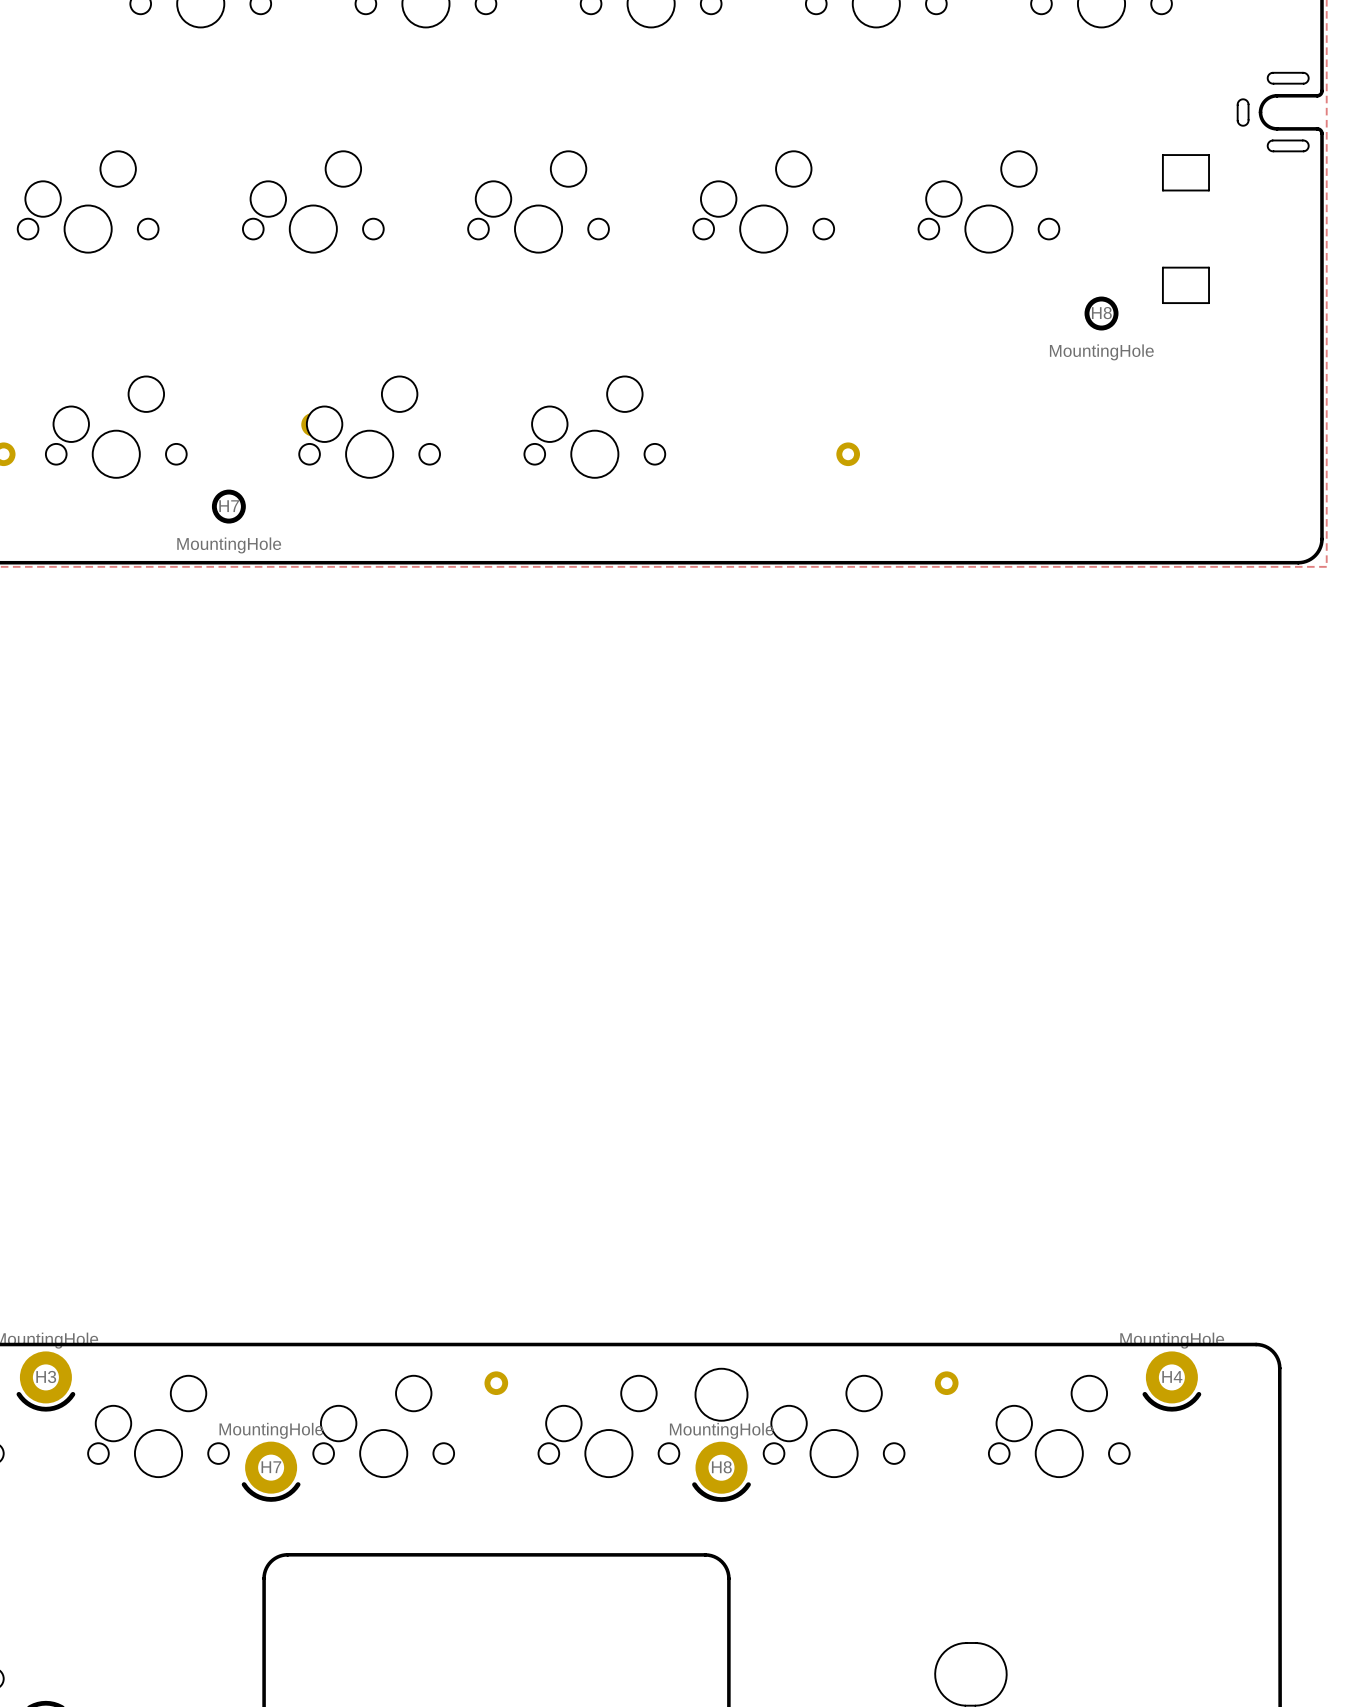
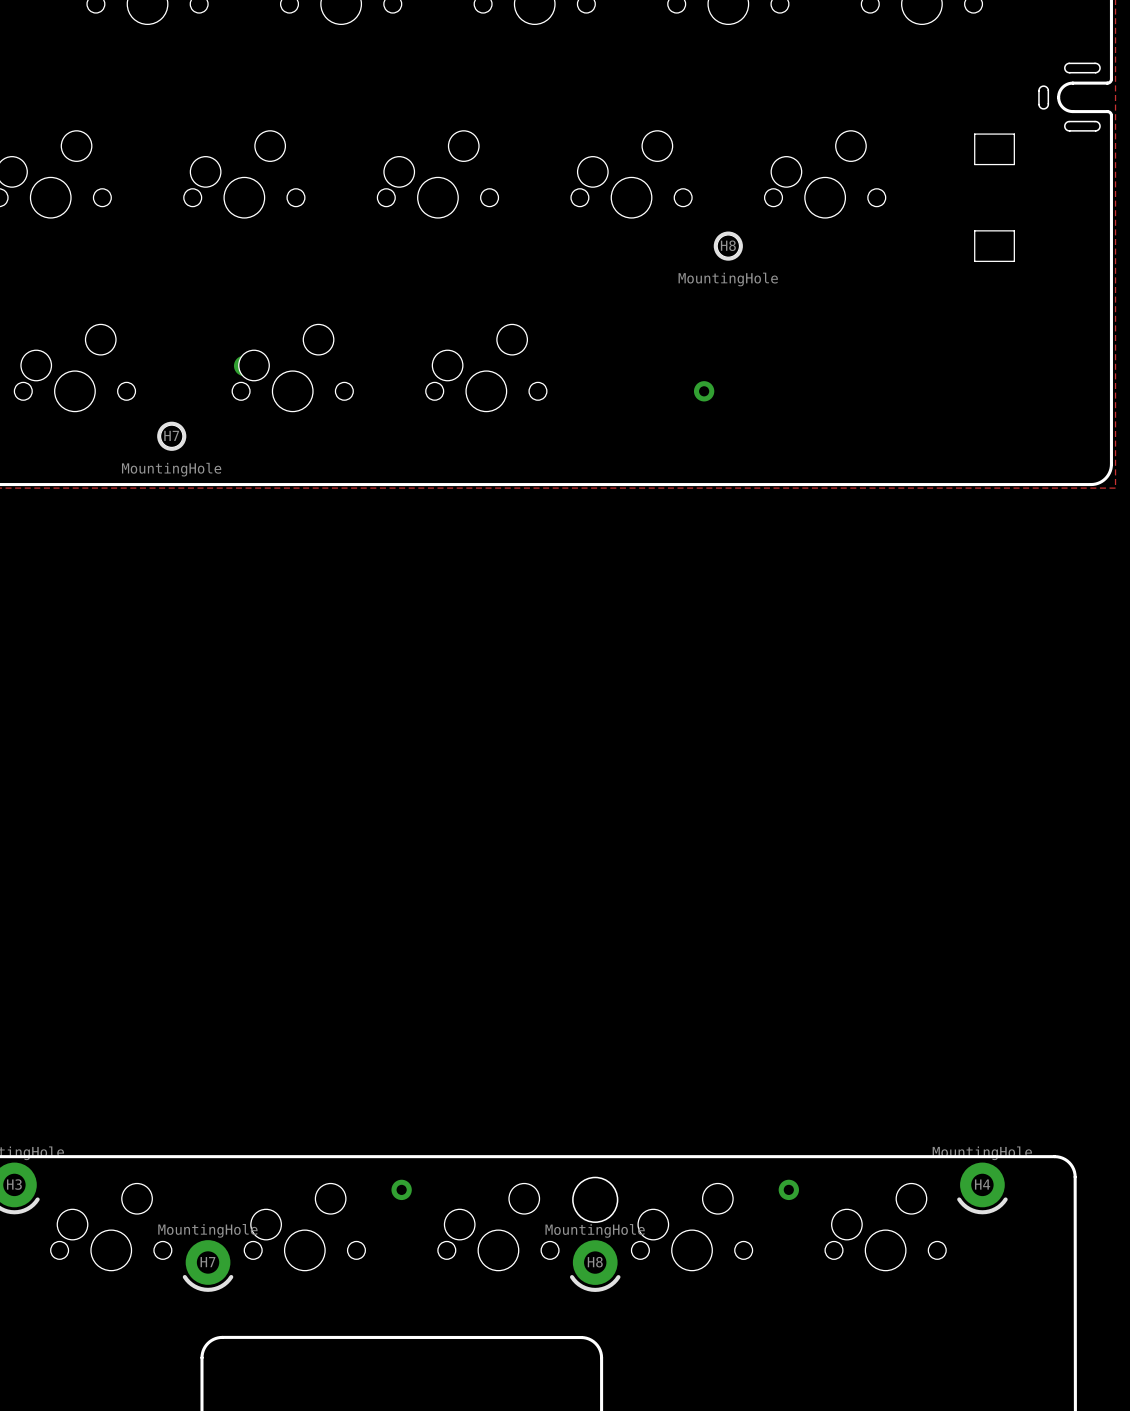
H8 position: (1101, 313) -> (728, 246)

